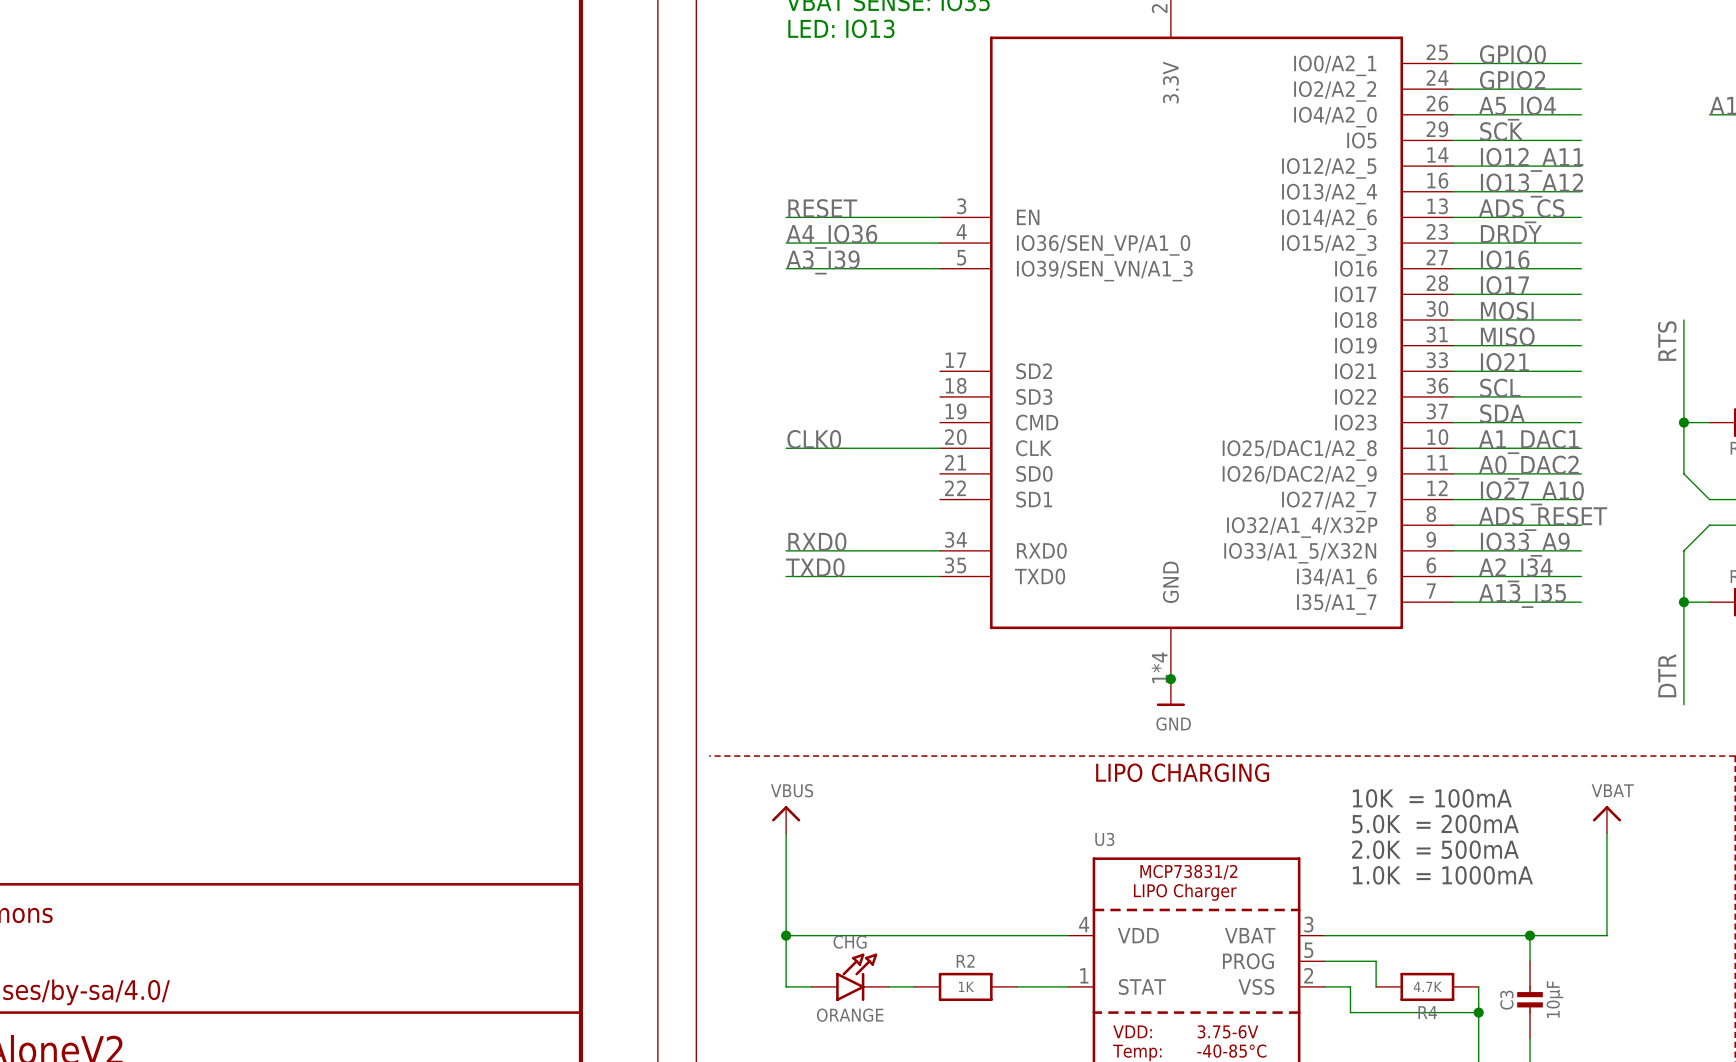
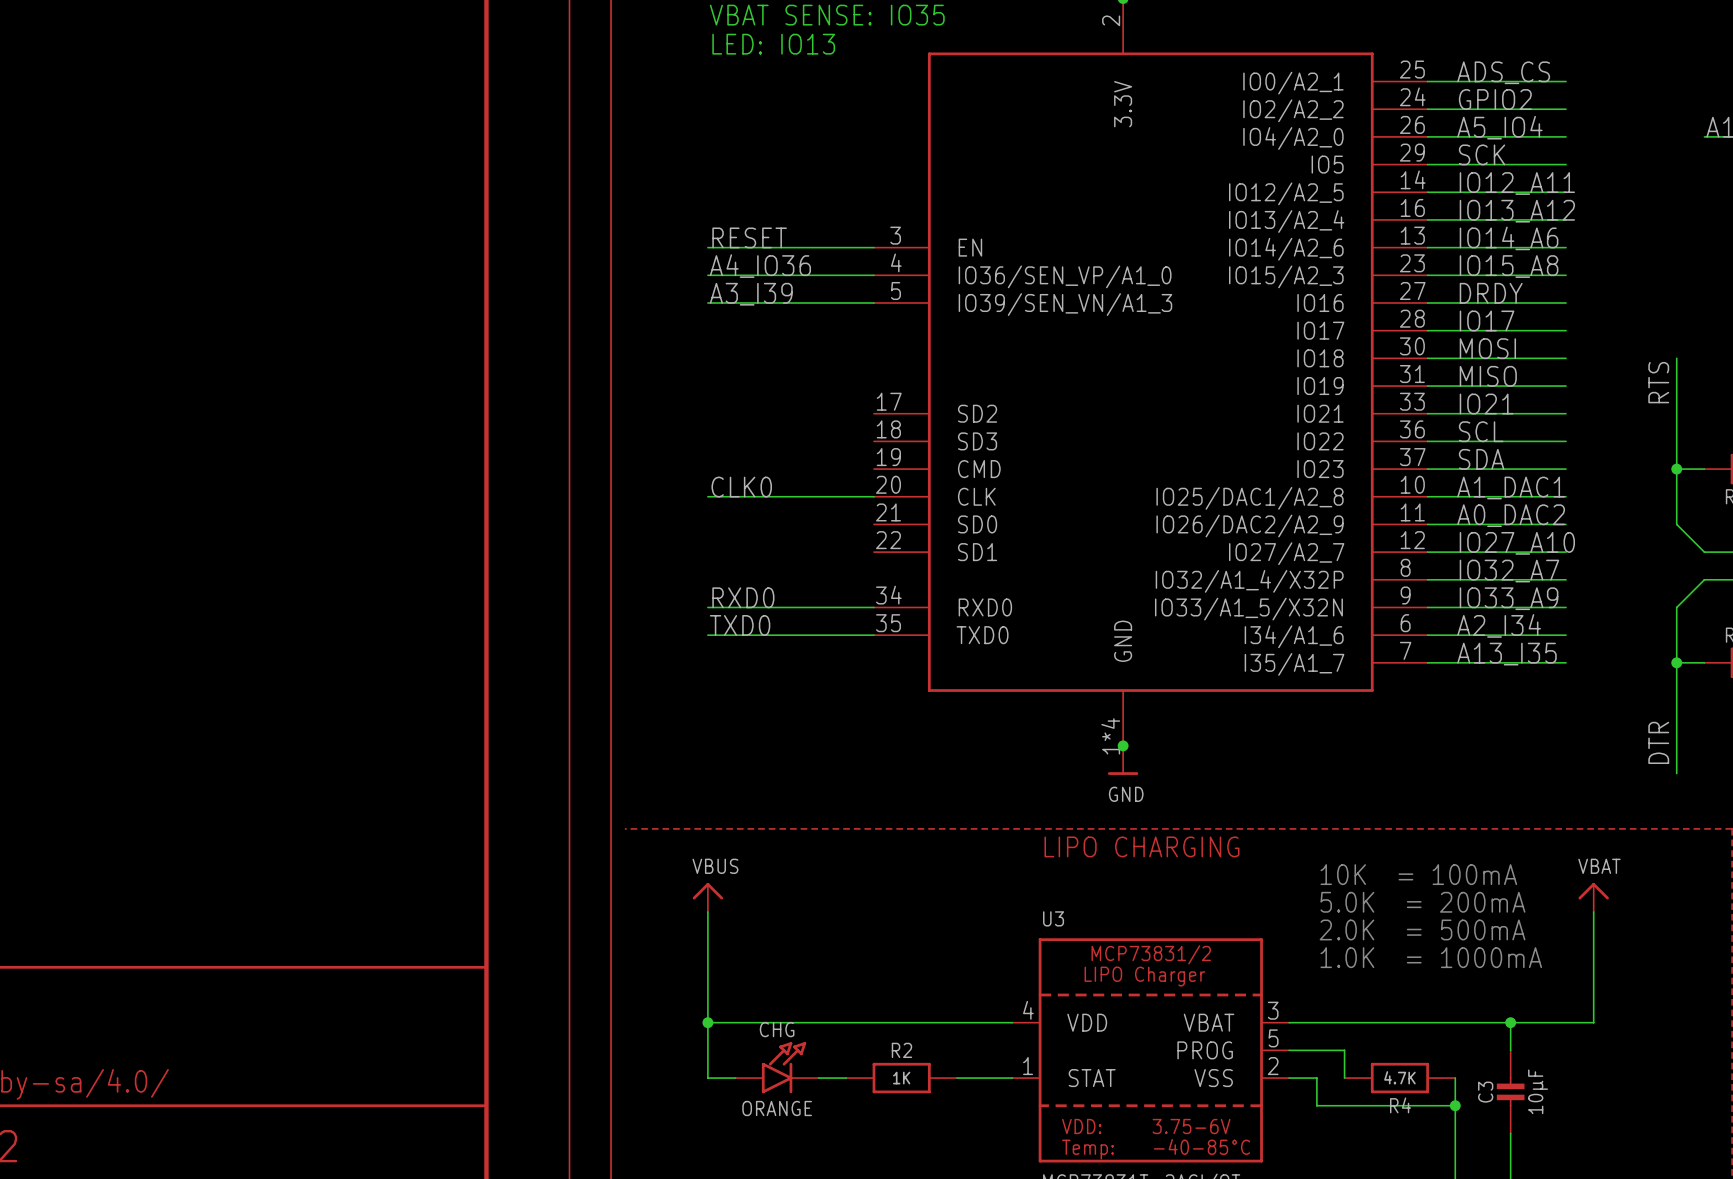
label: GPIO0 (1512, 54) -> ADS_CS (1503, 72)
label: ADS_CS (1521, 211) -> IO14_A6 (1509, 238)
label: DRDY (1511, 234) -> IO15_A8 (1509, 266)
label: IO16 (1505, 259) -> DRDY (1491, 293)
label: ADS_RESET (1543, 518) -> IO32_A7 (1509, 571)

